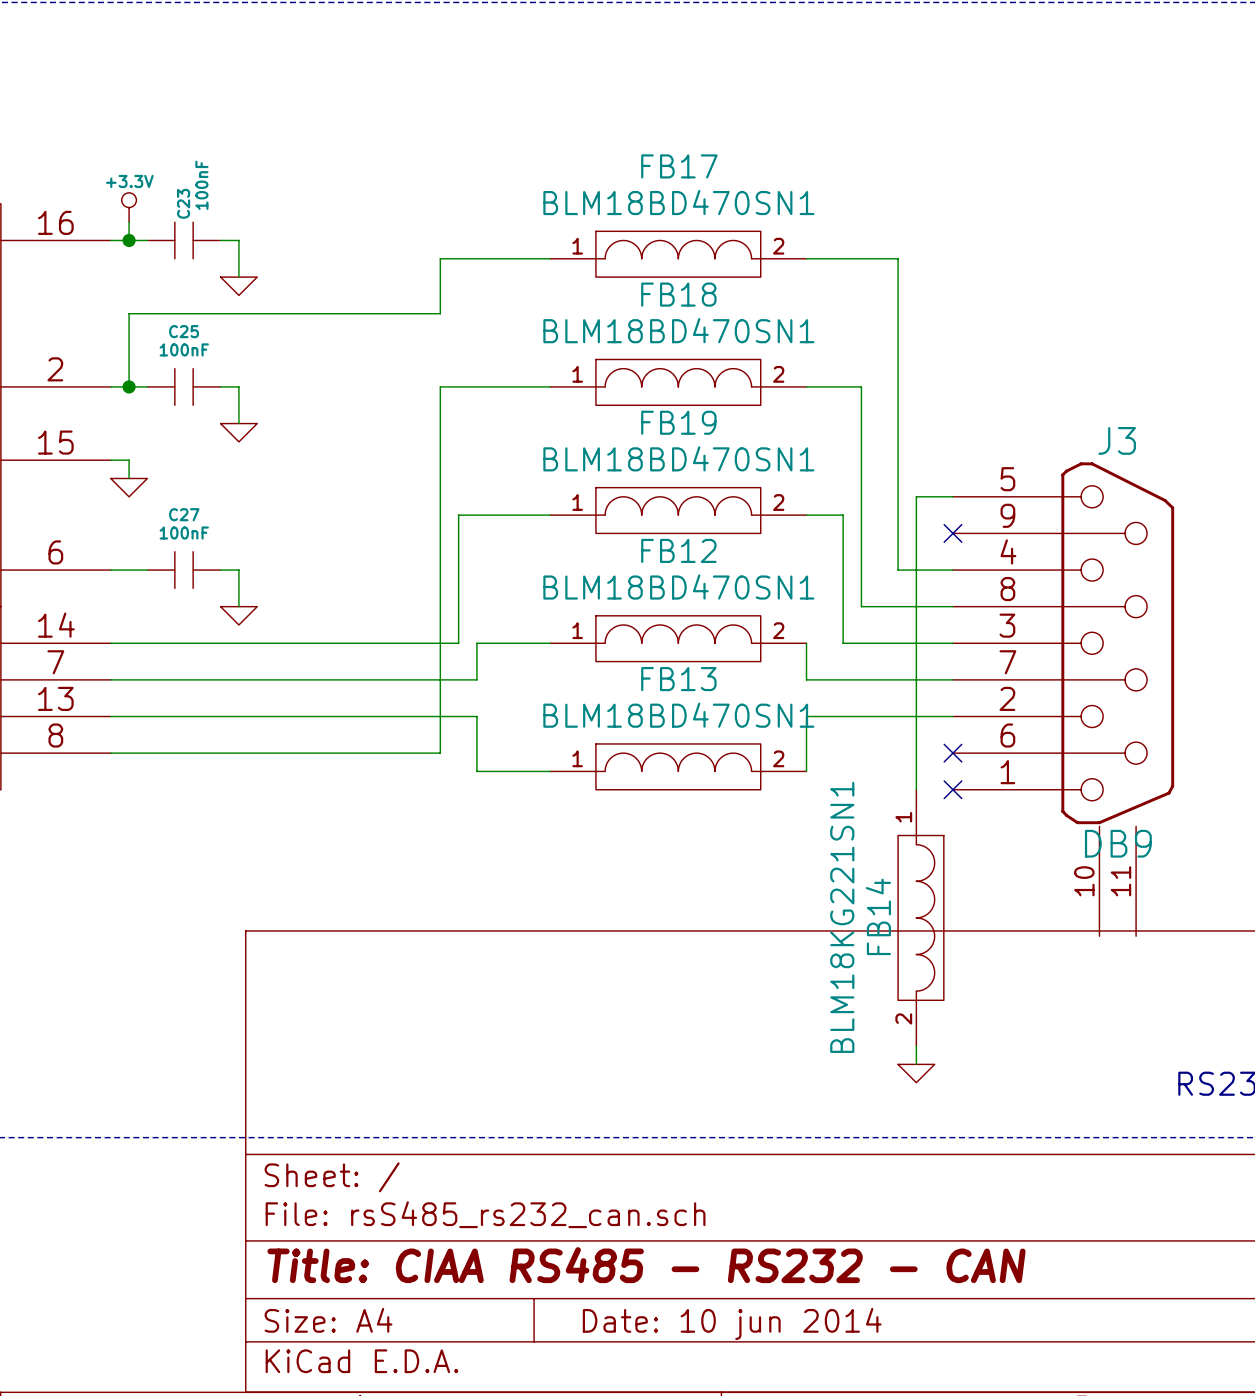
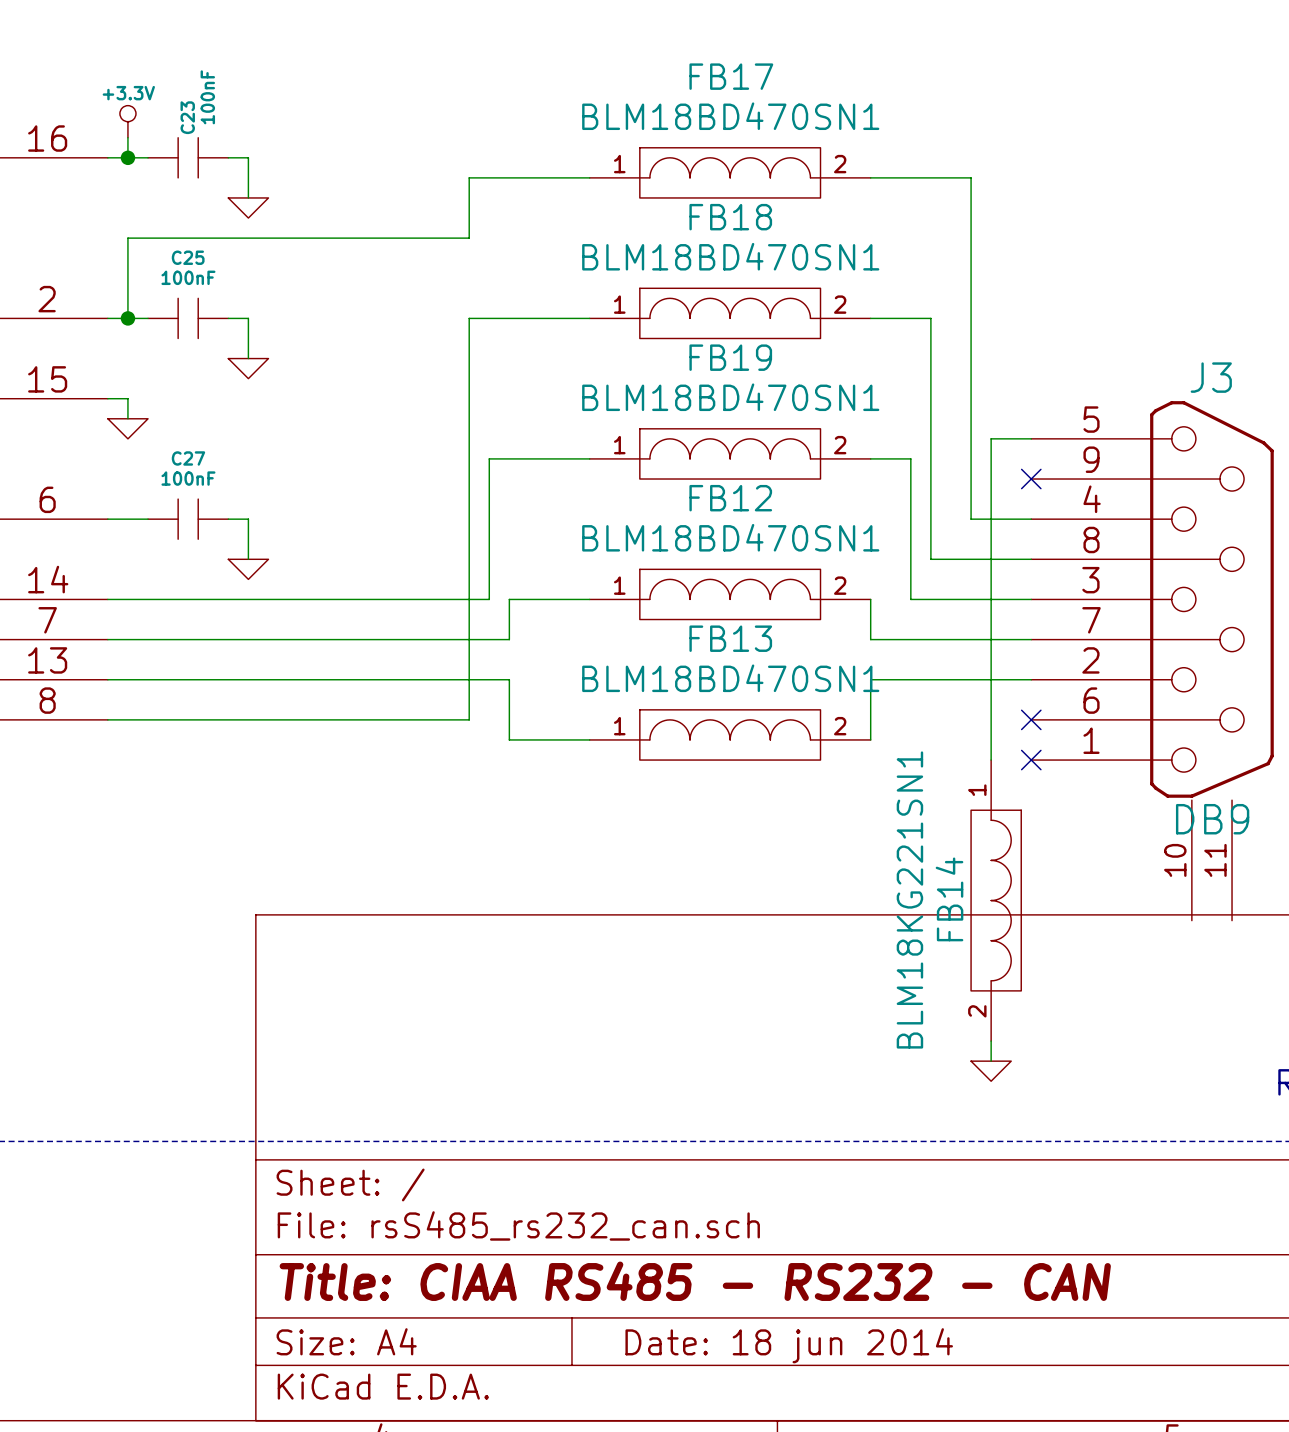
title block: Date: 10 jun 2014 (732, 1323) -> Date: 18 jun 2014 (789, 1345)

